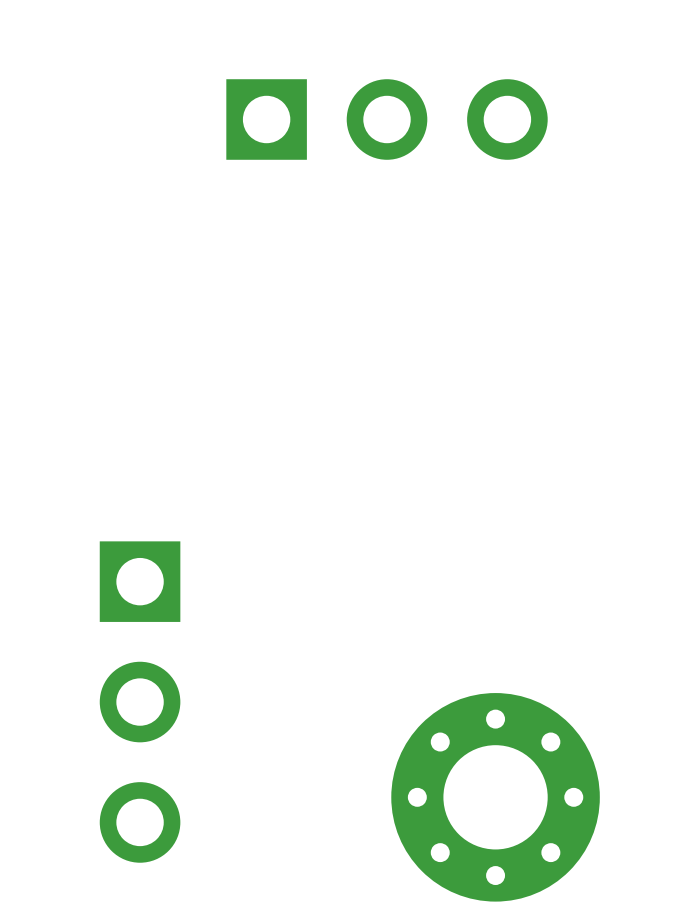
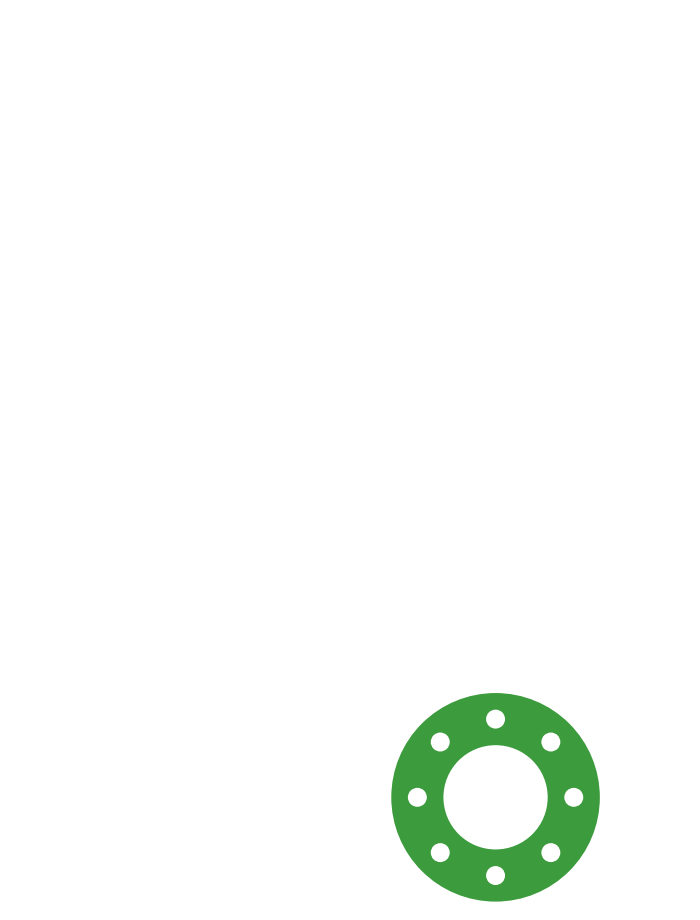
part: (387, 119) -> none
part: (140, 702) -> none

